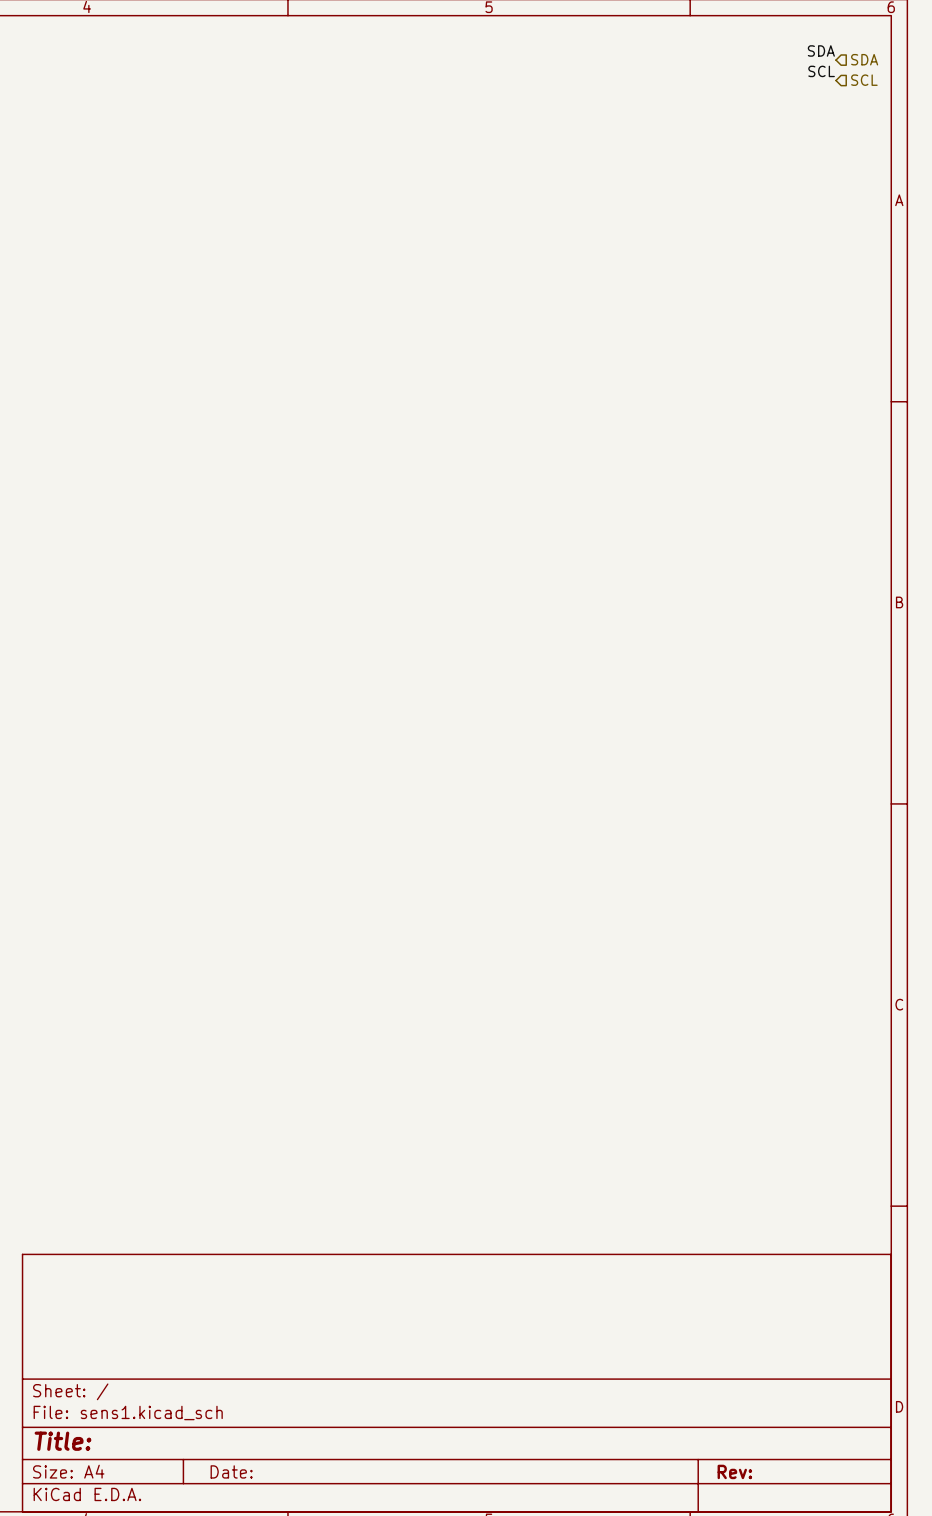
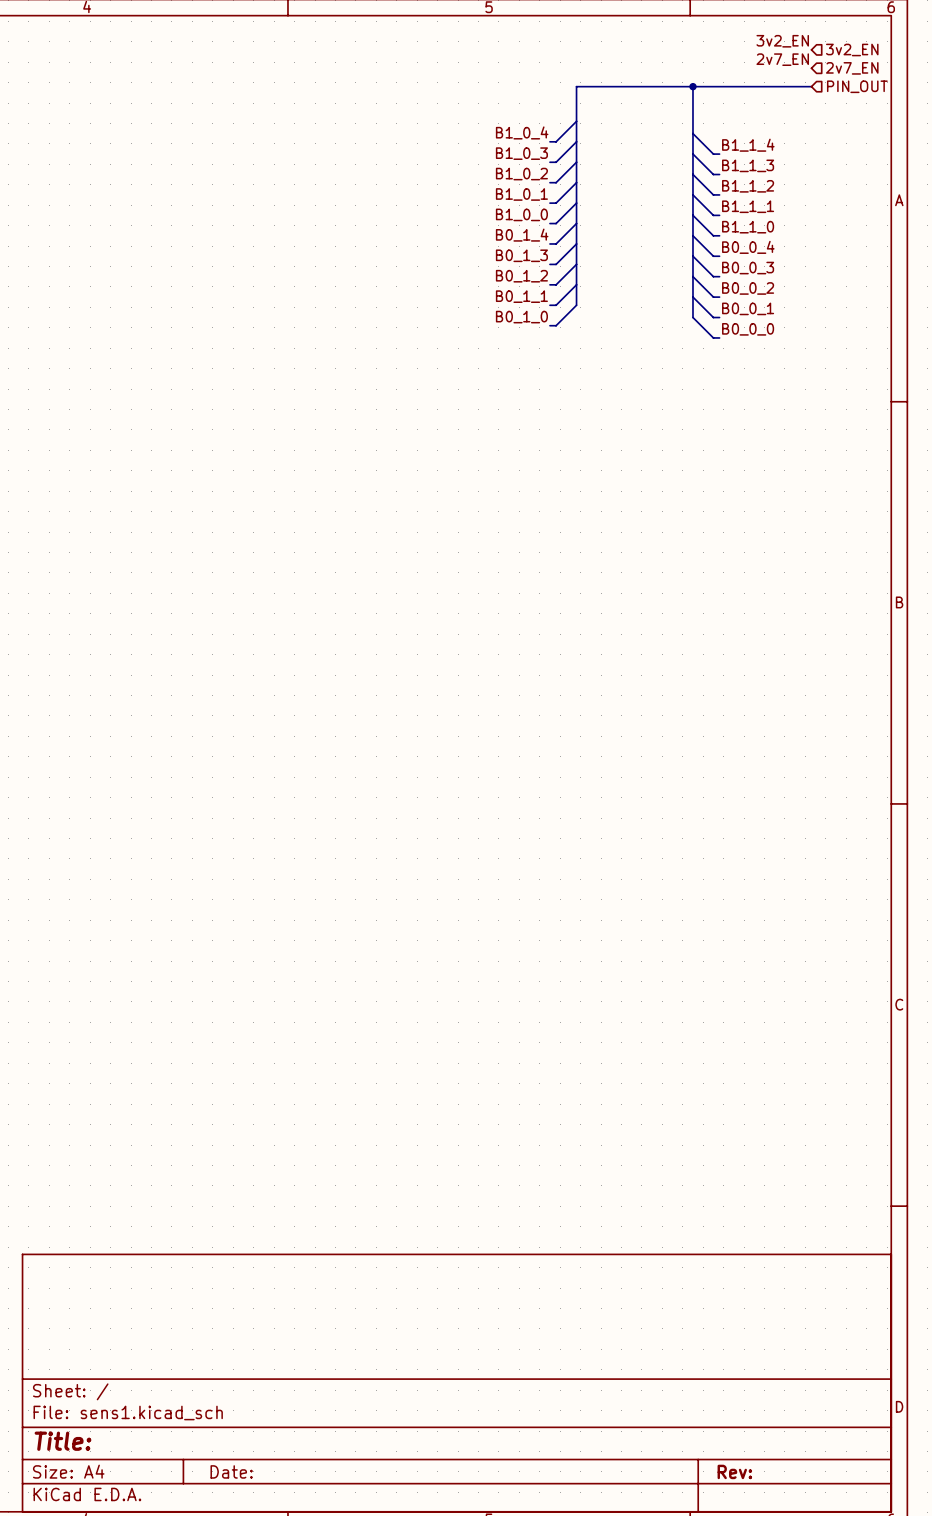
label: none -> 3v2_EN (782, 41)
hierarchical label: none -> 3v2_EN (852, 49)
label: SDA (821, 50) -> none
label: none -> 2v7_EN (782, 59)
hierarchical label: SDA (864, 59) -> none
hierarchical label: none -> 2v7_EN (852, 68)
label: SCL (821, 71) -> none
hierarchical label: SCL (864, 80) -> none
bus: none -> (692, 86) (692, 317)
junction: none -> (692, 86)
bus: none -> (811, 86) (576, 86) (576, 305)
hierarchical label: none -> PIN_OUT (857, 86)
wire: none -> (576, 121) (556, 141) (549, 141)
label: none -> B1_0_4 (522, 132)
wire: none -> (692, 133) (713, 154) (719, 154)
wire: none -> (576, 141) (556, 162) (549, 162)
label: none -> B1_1_4 (748, 145)
label: none -> B1_0_3 (521, 153)
wire: none -> (692, 154) (713, 174) (719, 174)
wire: none -> (576, 162) (556, 182) (549, 182)
label: none -> B1_1_3 (748, 165)
label: none -> B1_0_2 (521, 174)
wire: none -> (692, 174) (713, 194) (719, 194)
wire: none -> (576, 182) (556, 203) (549, 203)
label: none -> B1_1_2 (748, 186)
label: none -> B1_0_1 (521, 194)
wire: none -> (692, 194) (713, 215) (719, 215)
wire: none -> (576, 203) (556, 223) (549, 223)
label: none -> B1_1_1 (748, 206)
label: none -> B1_0_0 (521, 214)
wire: none -> (692, 215) (713, 235) (719, 235)
wire: none -> (576, 223) (556, 243) (549, 243)
label: none -> B1_1_0 (748, 227)
label: none -> B0_1_4 (522, 235)
wire: none -> (692, 235) (713, 256) (719, 256)
wire: none -> (576, 243) (556, 264) (549, 264)
label: none -> B0_0_4 (748, 247)
label: none -> B0_1_3 (521, 255)
wire: none -> (692, 256) (713, 276) (719, 276)
wire: none -> (576, 264) (556, 284) (549, 284)
label: none -> B0_0_3 (748, 268)
label: none -> B0_1_2 (521, 276)
wire: none -> (692, 276) (713, 297) (719, 297)
wire: none -> (576, 284) (556, 305) (549, 305)
label: none -> B0_0_2 (748, 288)
label: none -> B0_1_1 (521, 296)
wire: none -> (692, 297) (713, 317) (719, 317)
wire: none -> (576, 305) (556, 325) (549, 325)
label: none -> B0_0_1 (748, 308)
label: none -> B0_1_0 (521, 317)
wire: none -> (692, 317) (713, 337) (719, 337)
label: none -> B0_0_0 (748, 329)

